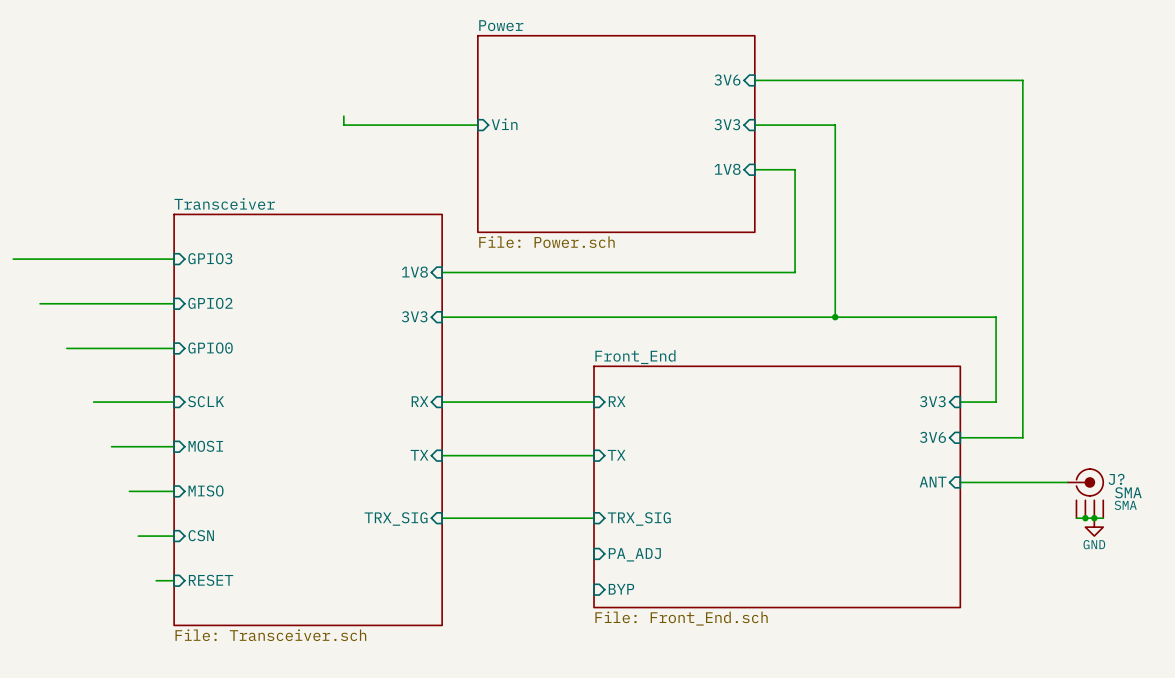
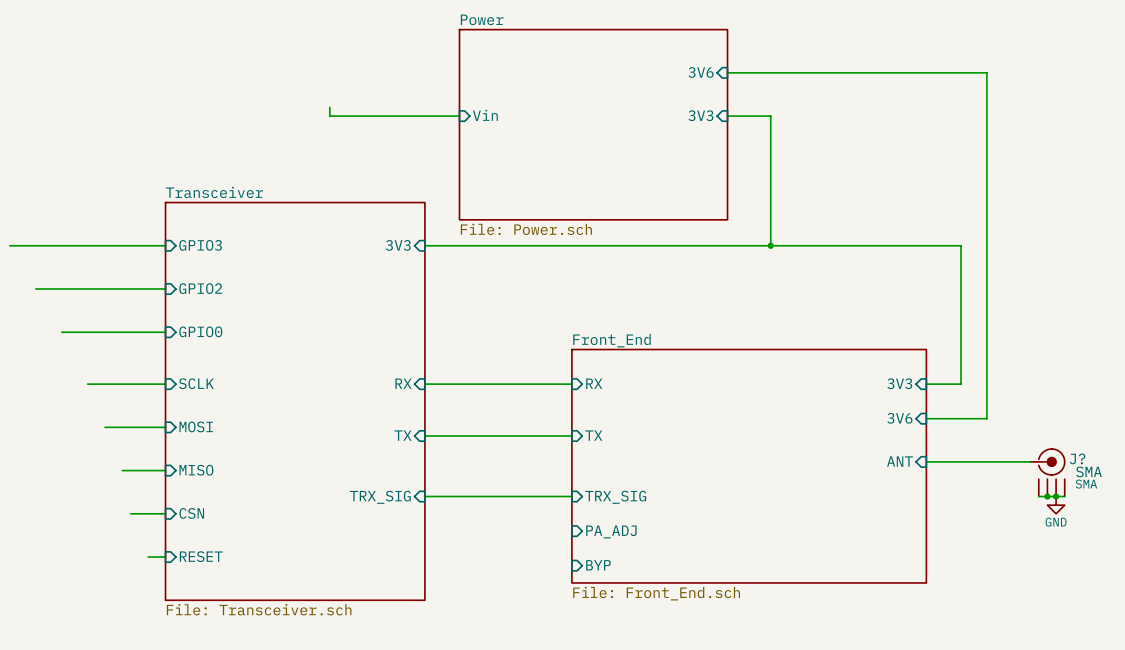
wire: (799, 125) (835, 125) (835, 317) -> (770, 116) (770, 245)
sheet pin: 1V8 (727, 169) -> none
wire: (754, 169) (795, 169) (795, 272) (442, 272) -> none
junction: none -> (770, 245)
sheet pin: 1V8 (414, 272) -> none
sheet pin position: 3V3 (414, 316) -> 3V3 (398, 245)
wire: (442, 317) (996, 317) -> (424, 245) (960, 245) (960, 301)
junction: (835, 317) -> none

